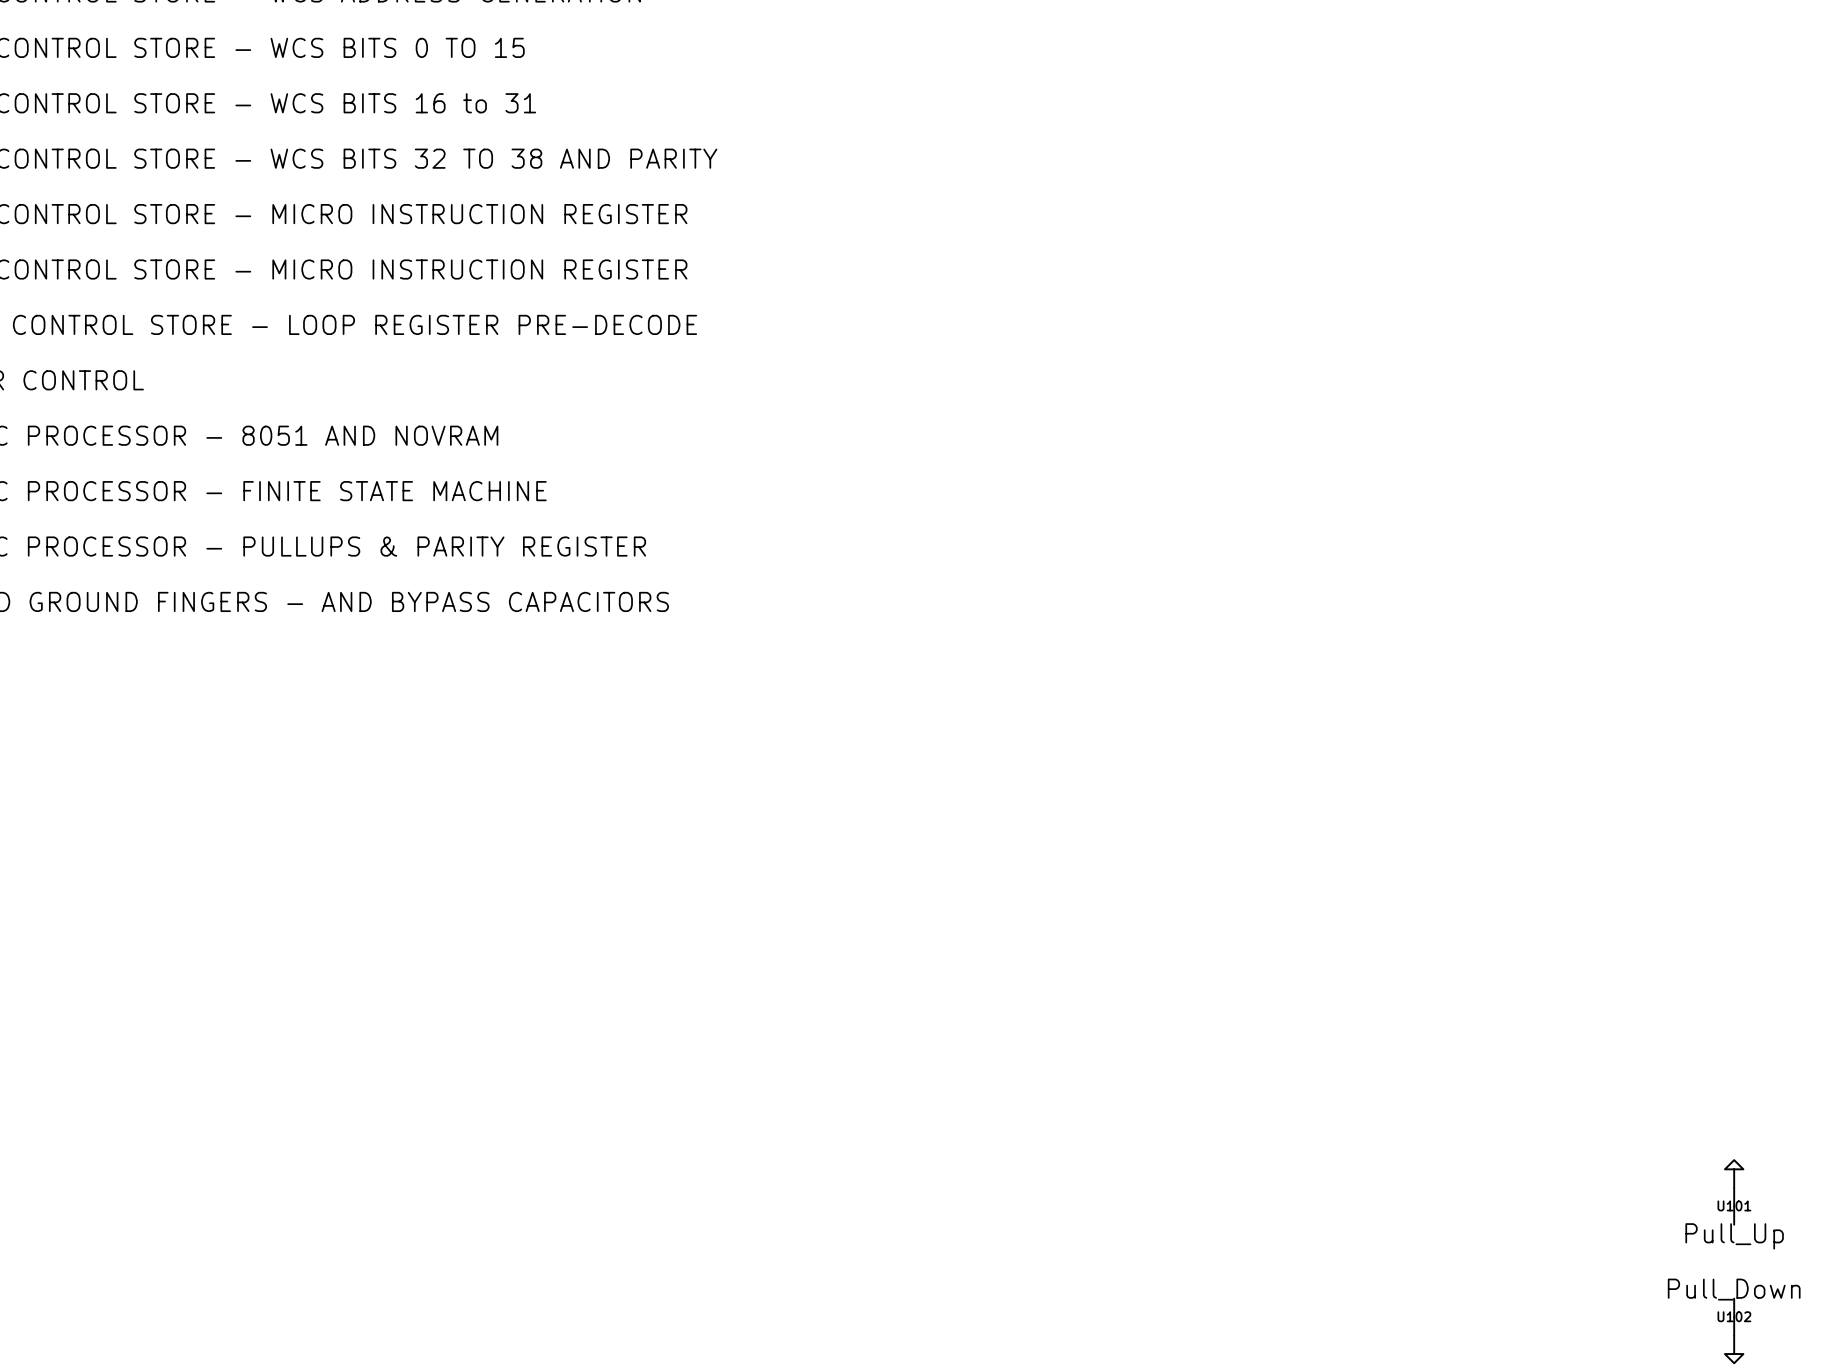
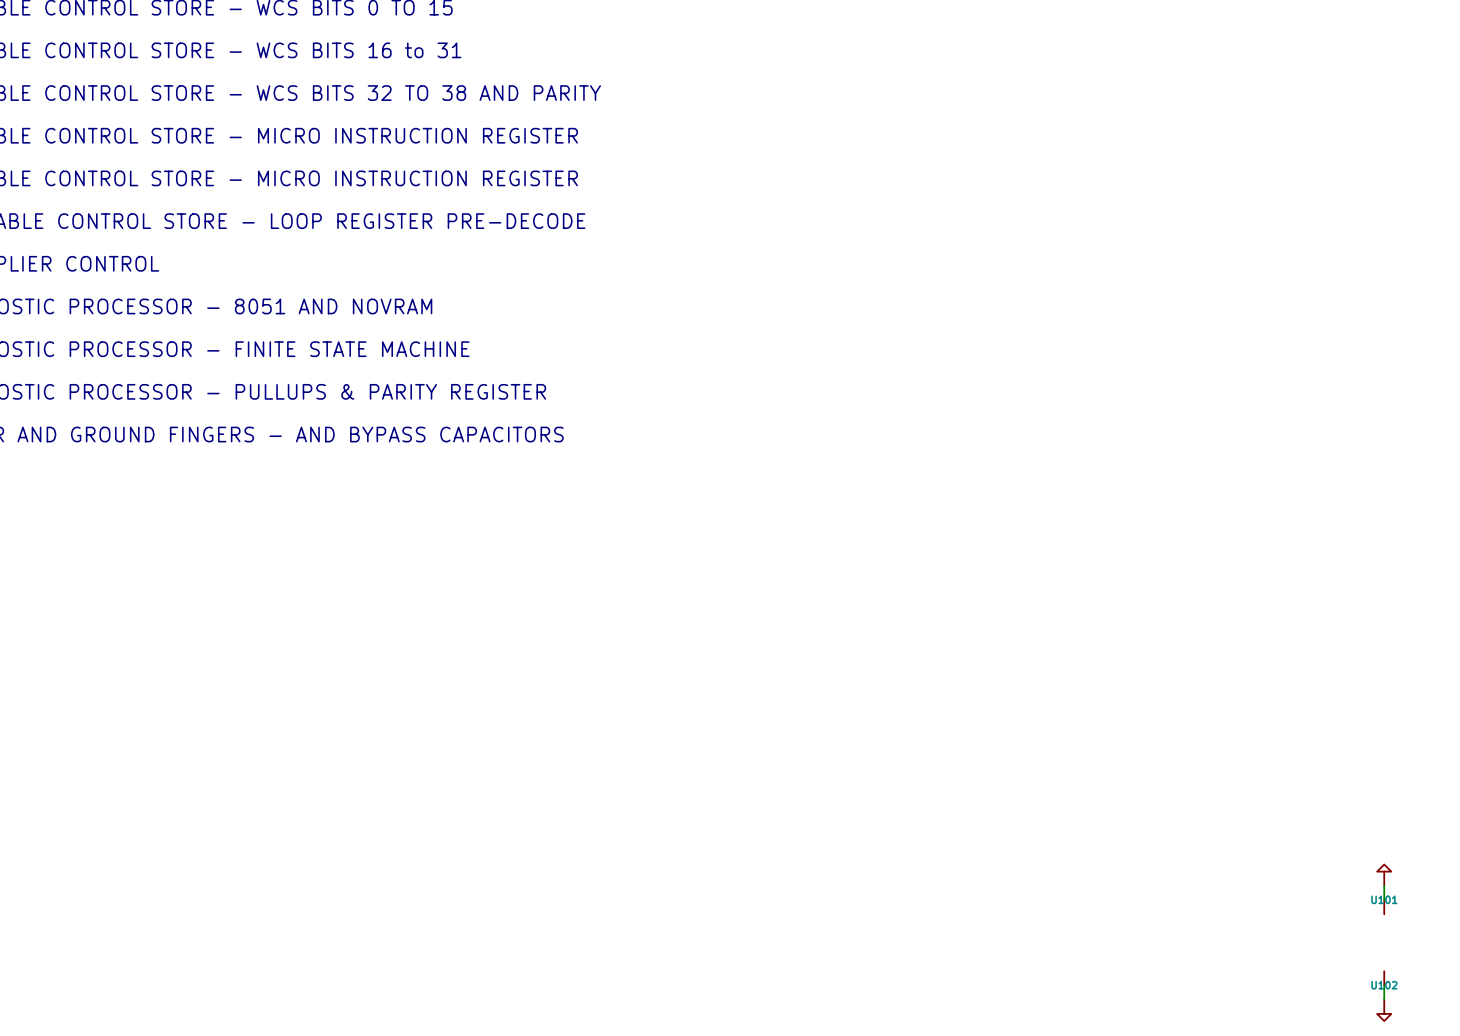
U101 value: Pull_Up (1734, 1236) -> none
U102 value: Pull_Down (1734, 1289) -> none

